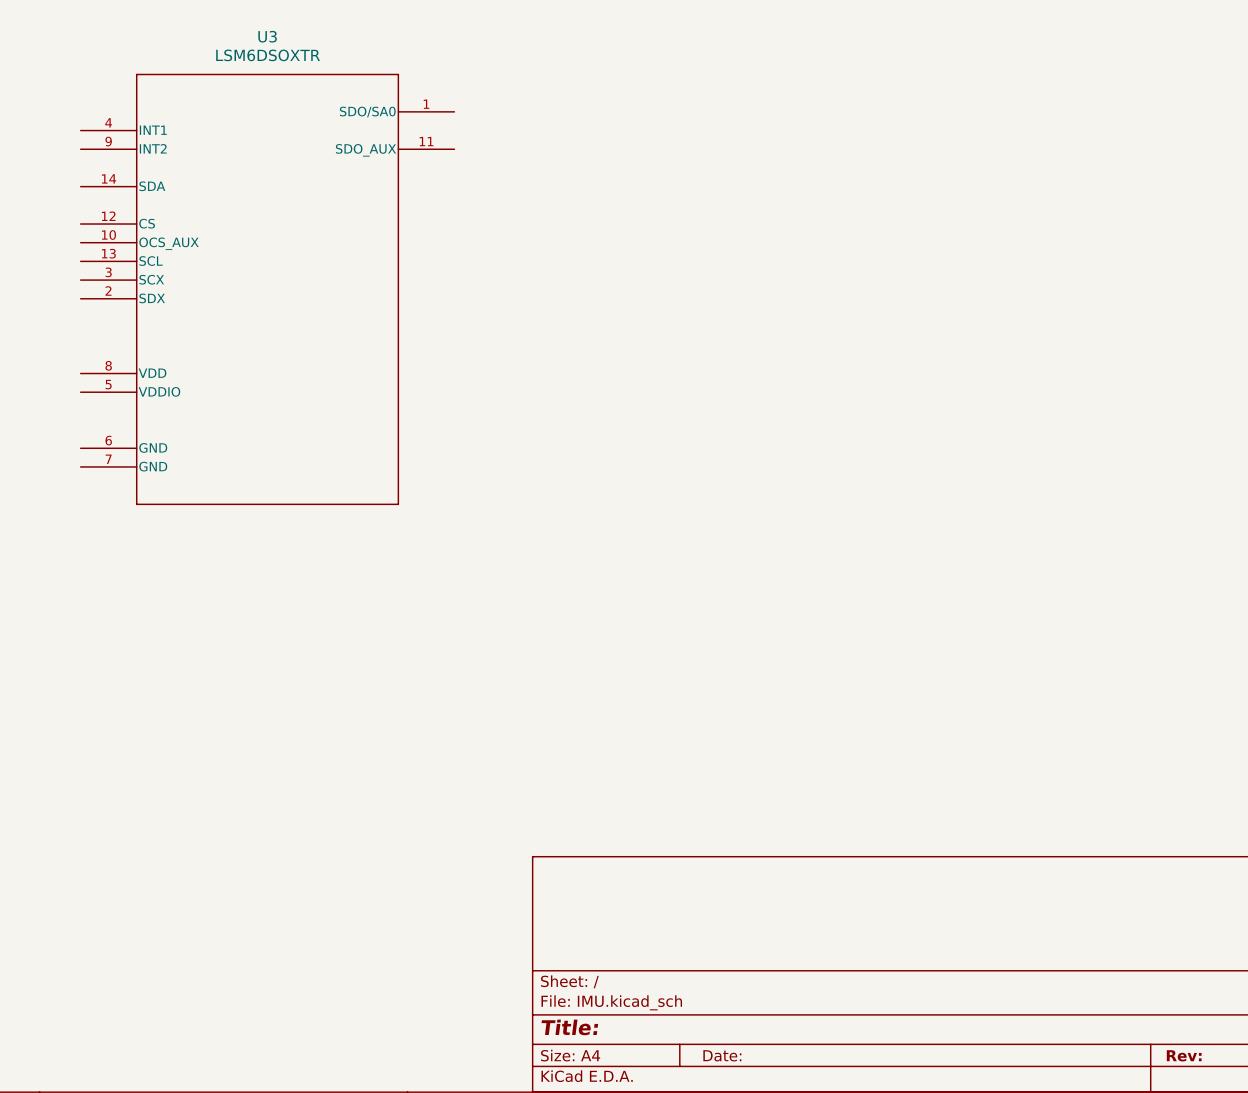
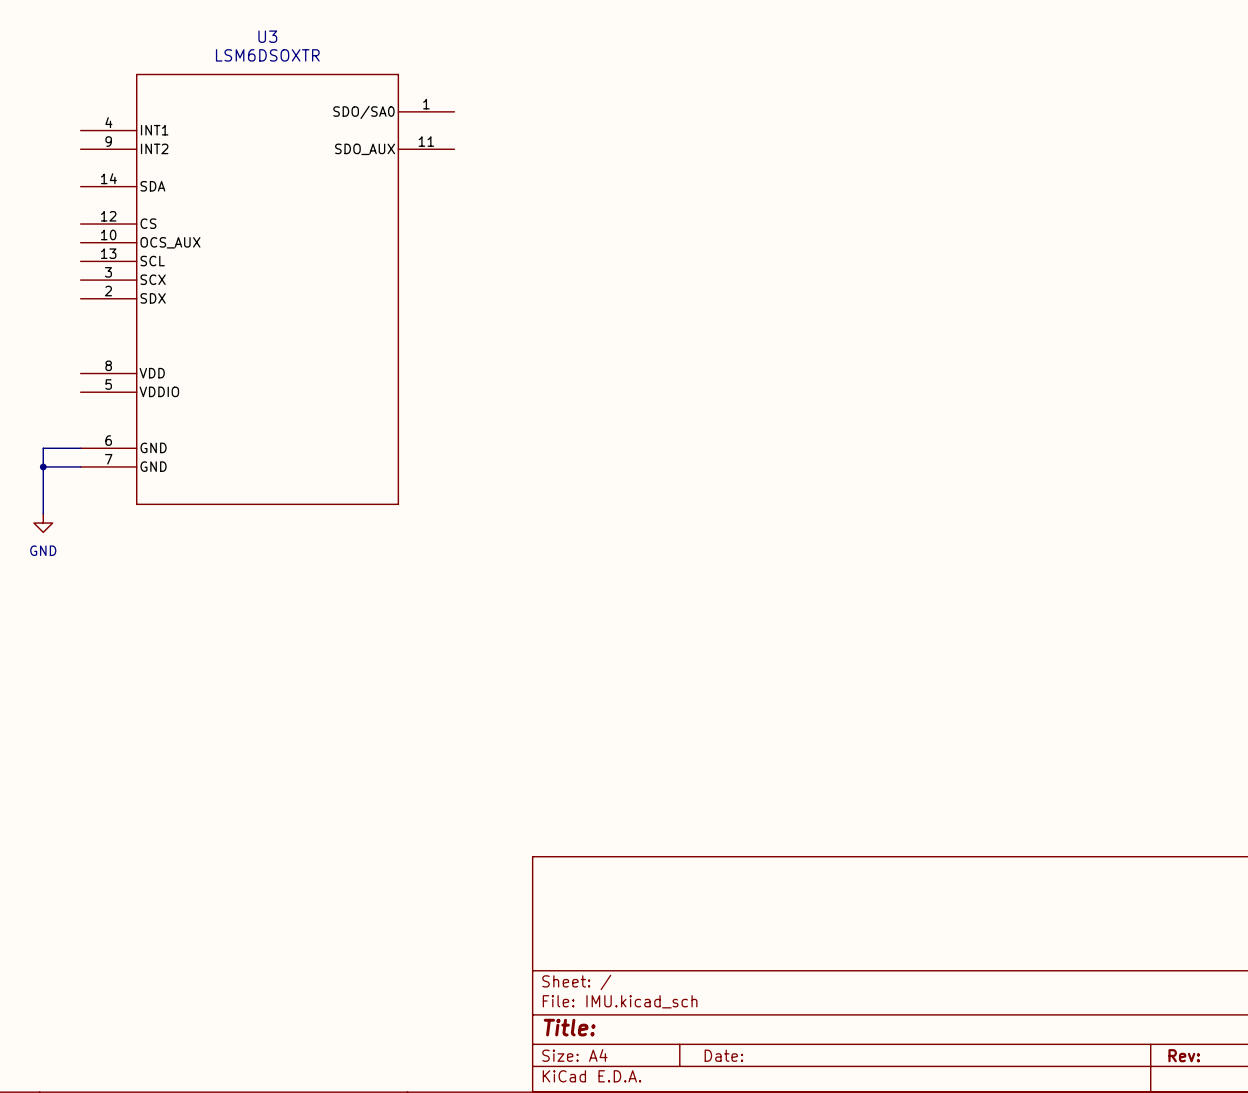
wire: none -> (80, 448) (43, 448) (43, 513)
wire: none -> (43, 466) (80, 466)
junction: none -> (43, 466)
power symbol: none -> GND (43, 523)

